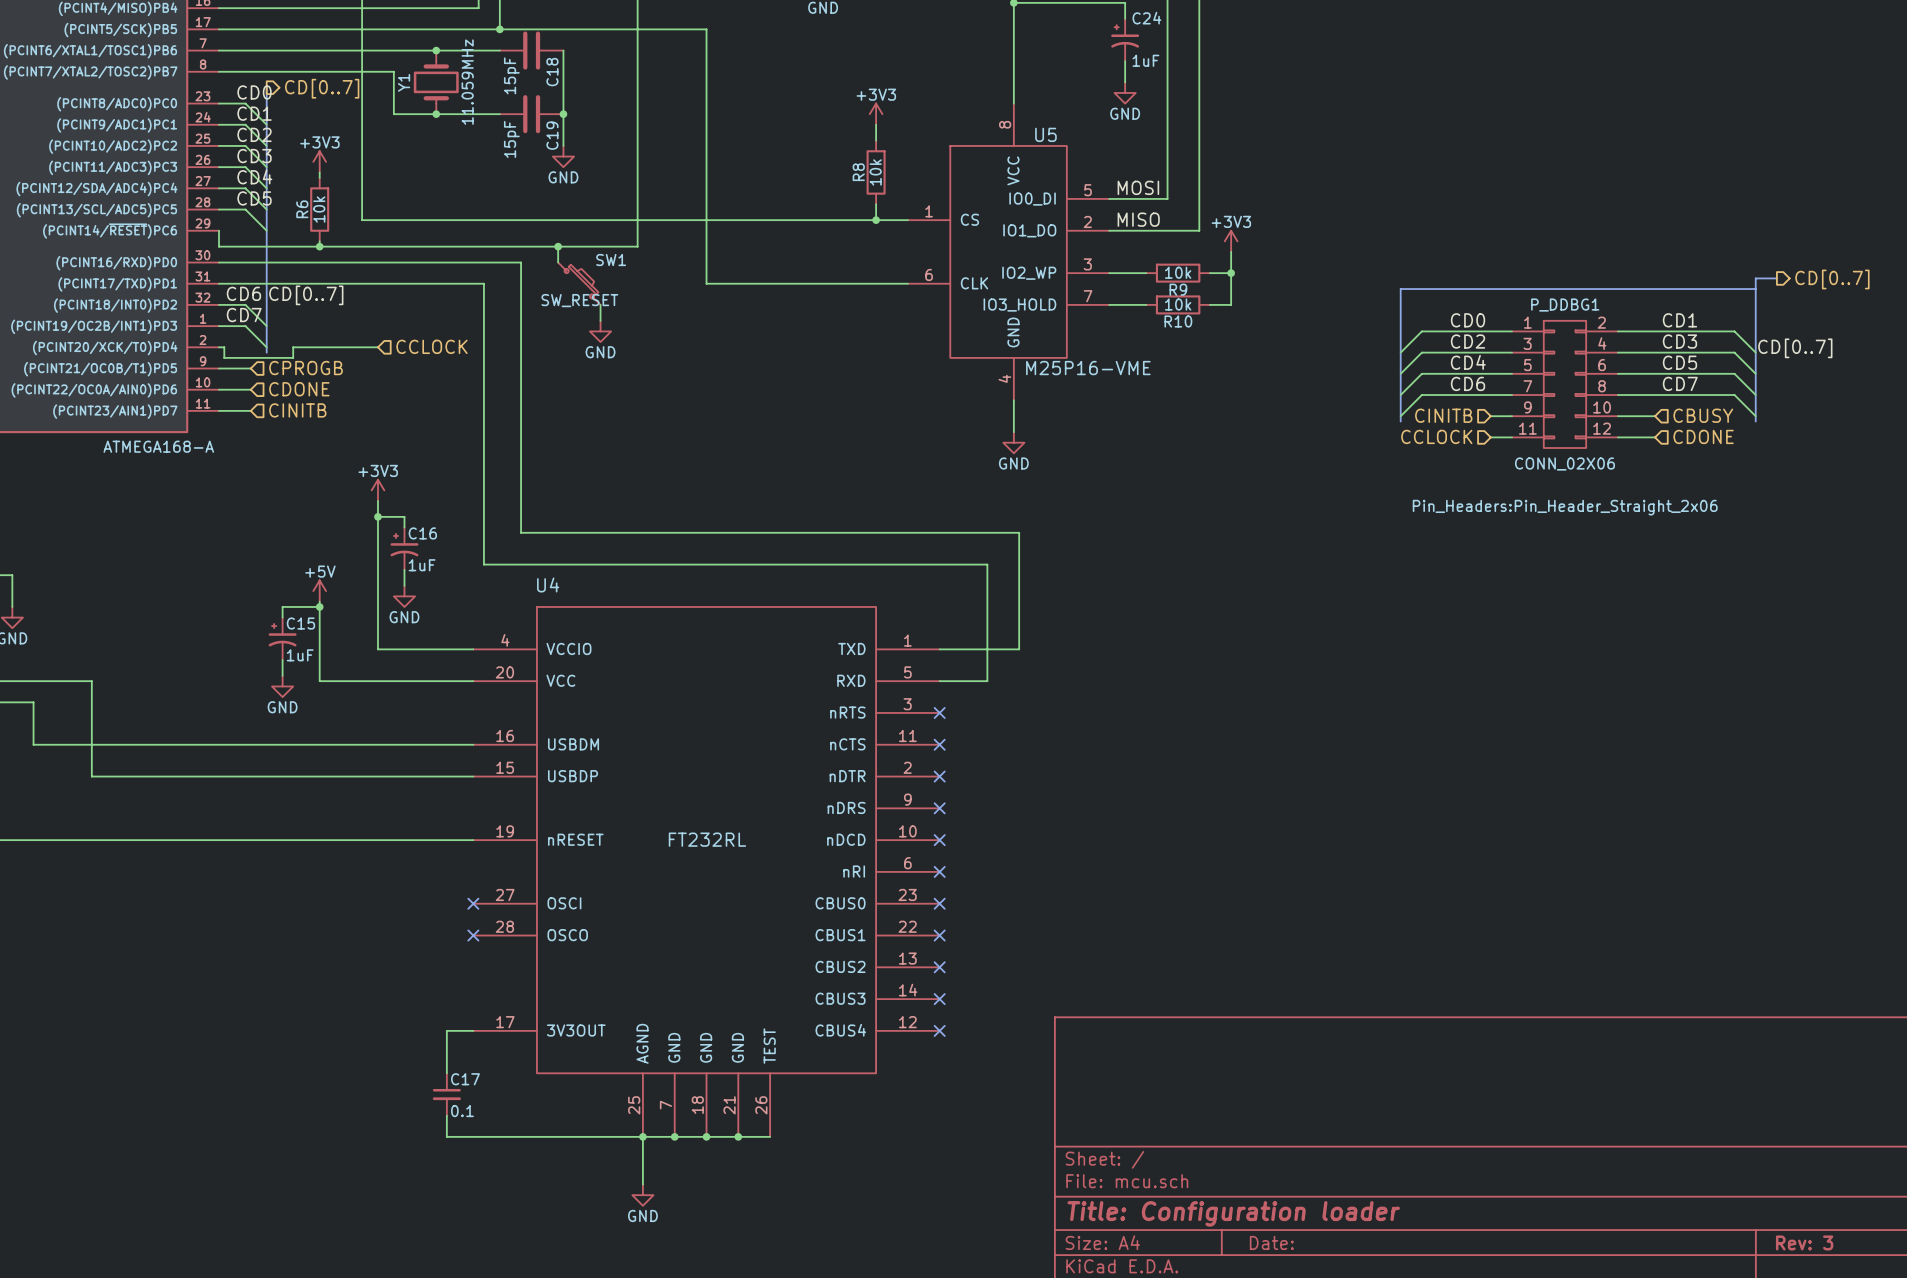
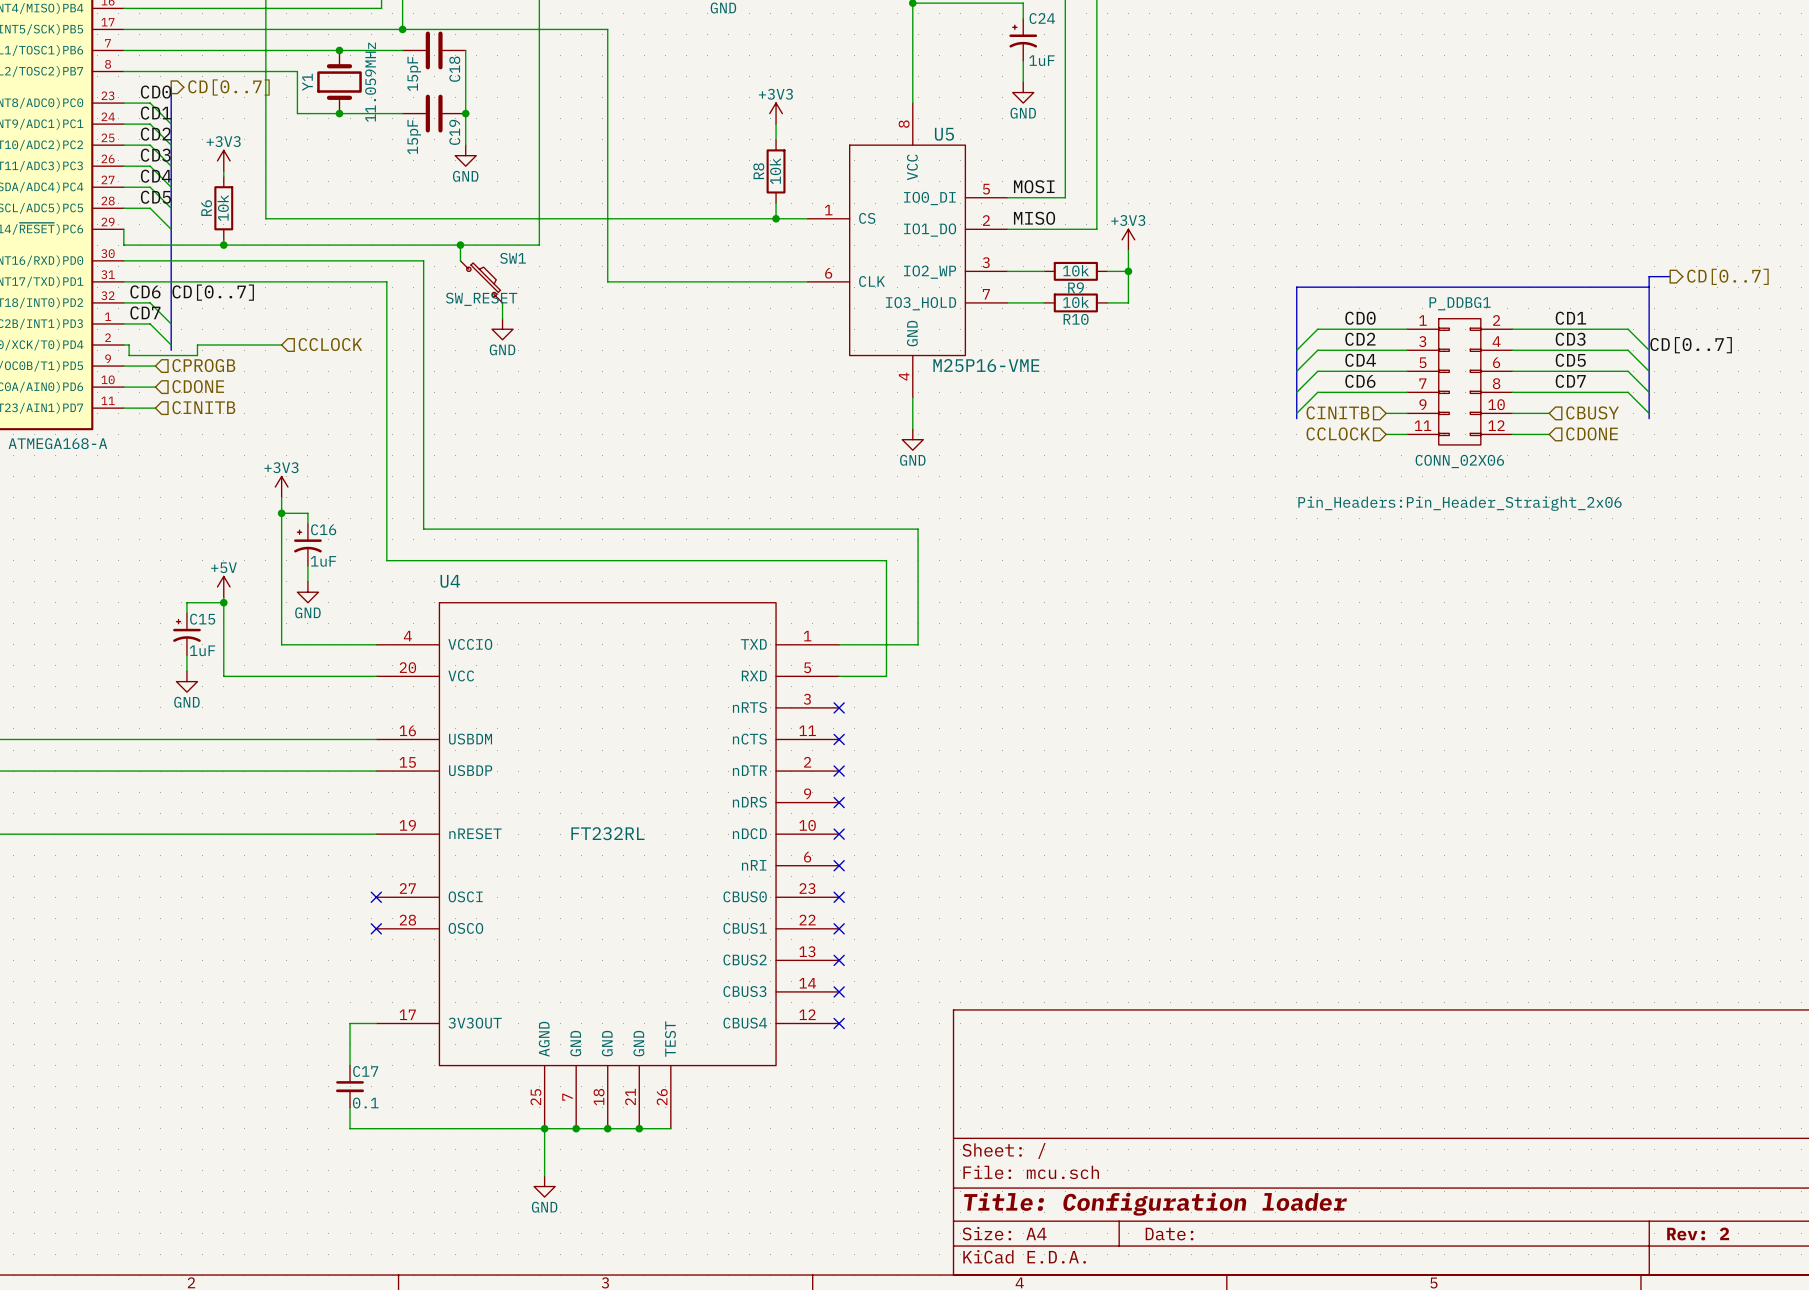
title block: Rev: 3 (1804, 1242) -> Rev: 2 (1698, 1233)

